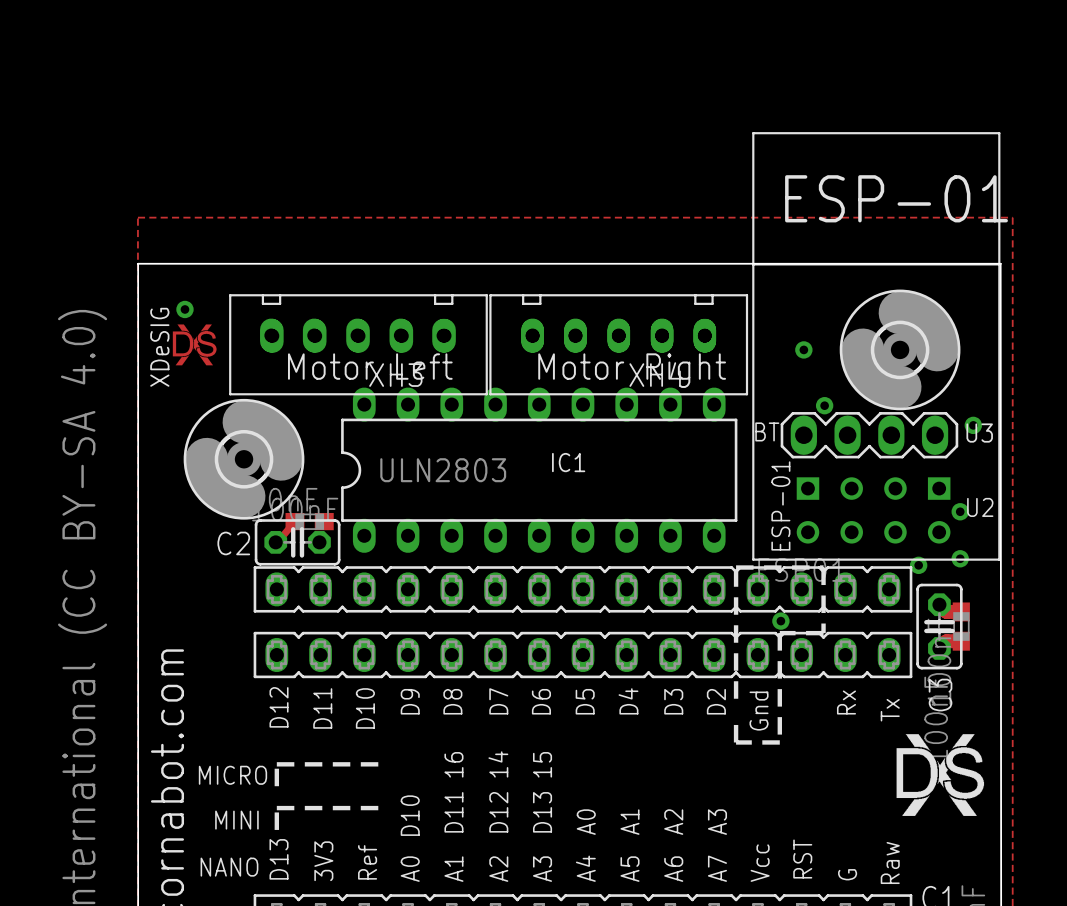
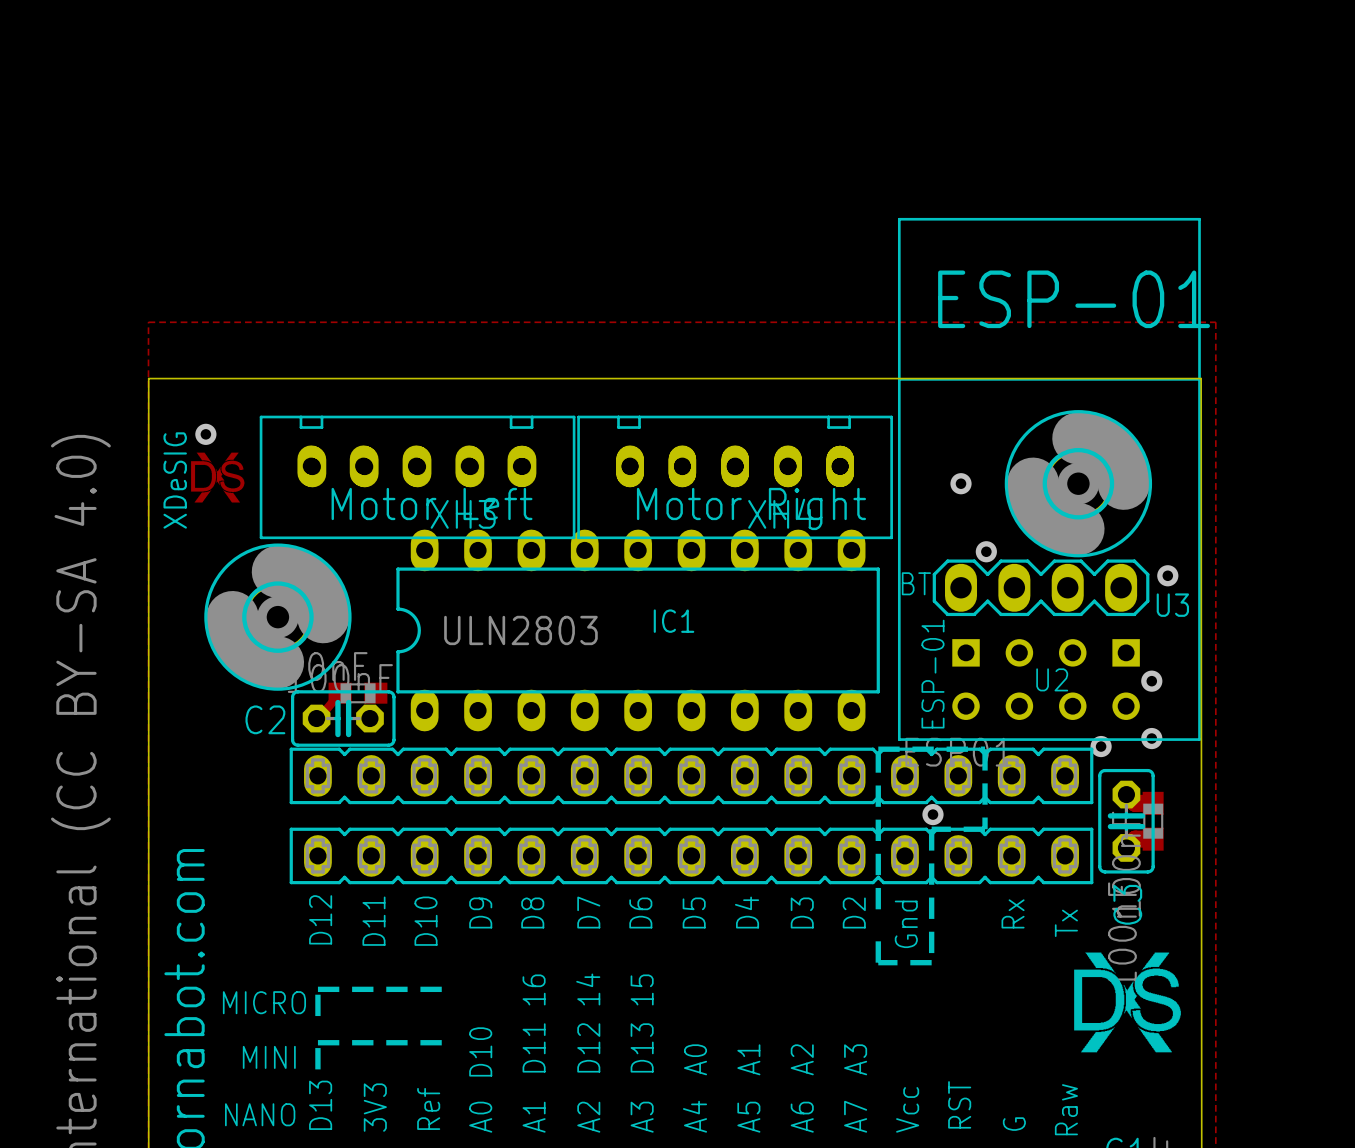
U3 name position: U3 (979, 433) -> U3 (1172, 605)
U2 name position: U2 (980, 507) -> U2 (1052, 679)

